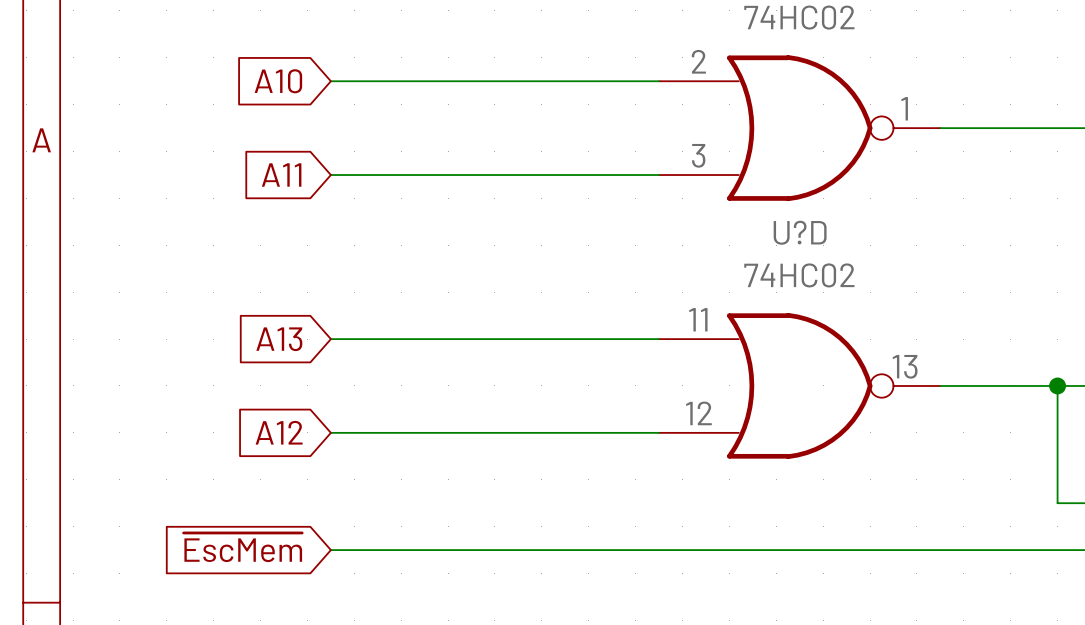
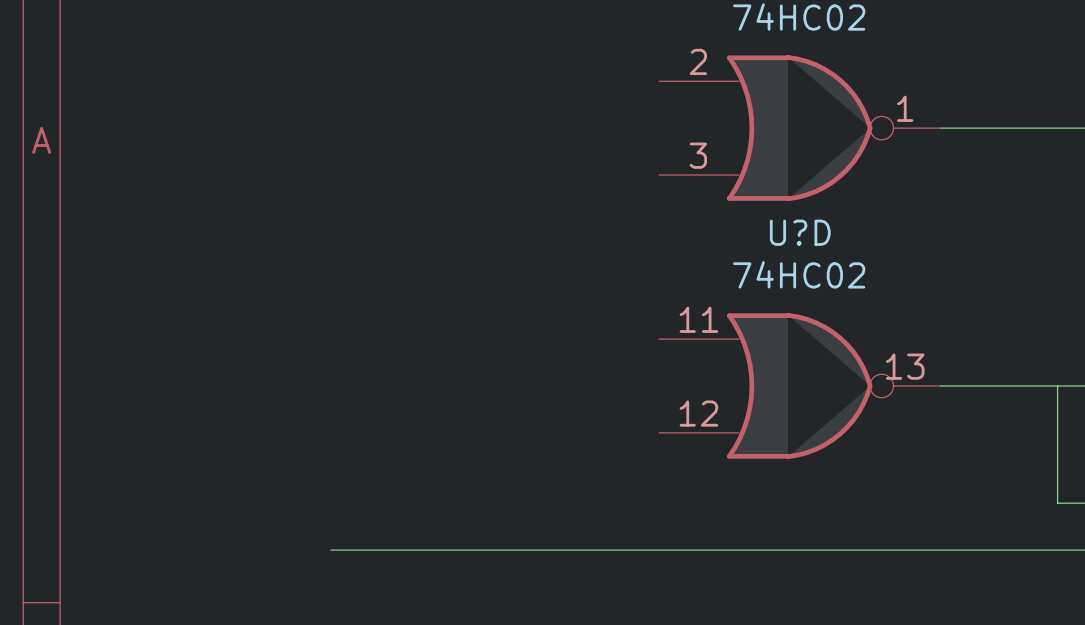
global label: A10 (278, 81) -> none
wire: (330, 81) (659, 81) -> none
global label: A11 (281, 175) -> none
wire: (330, 175) (659, 175) -> none
global label: A13 (279, 339) -> none
wire: (330, 339) (659, 339) -> none
junction: (1057, 385) -> none
global label: A12 (279, 432) -> none
wire: (330, 432) (659, 432) -> none
global label: ~{EscMem} (242, 547) -> none

